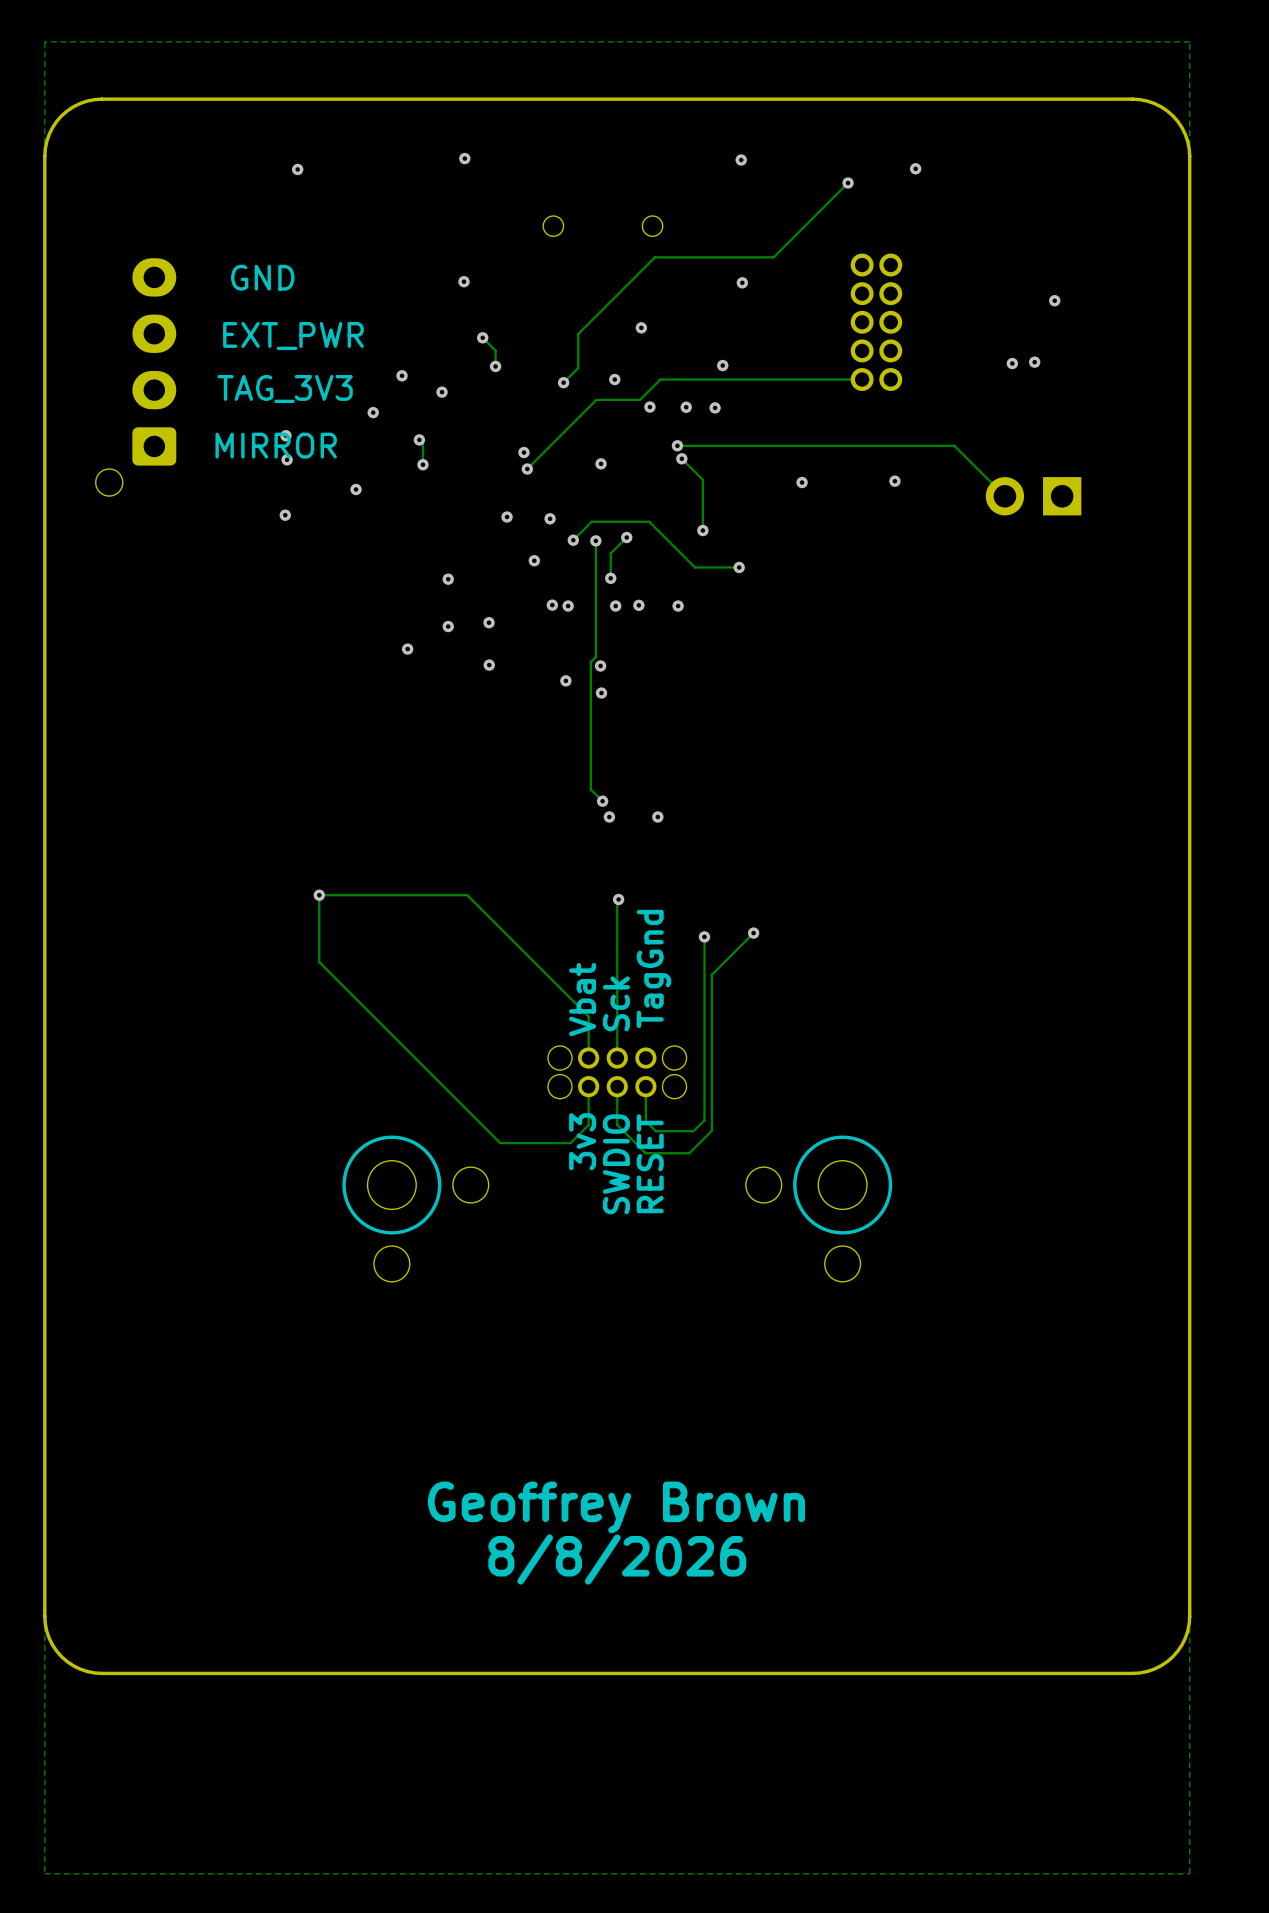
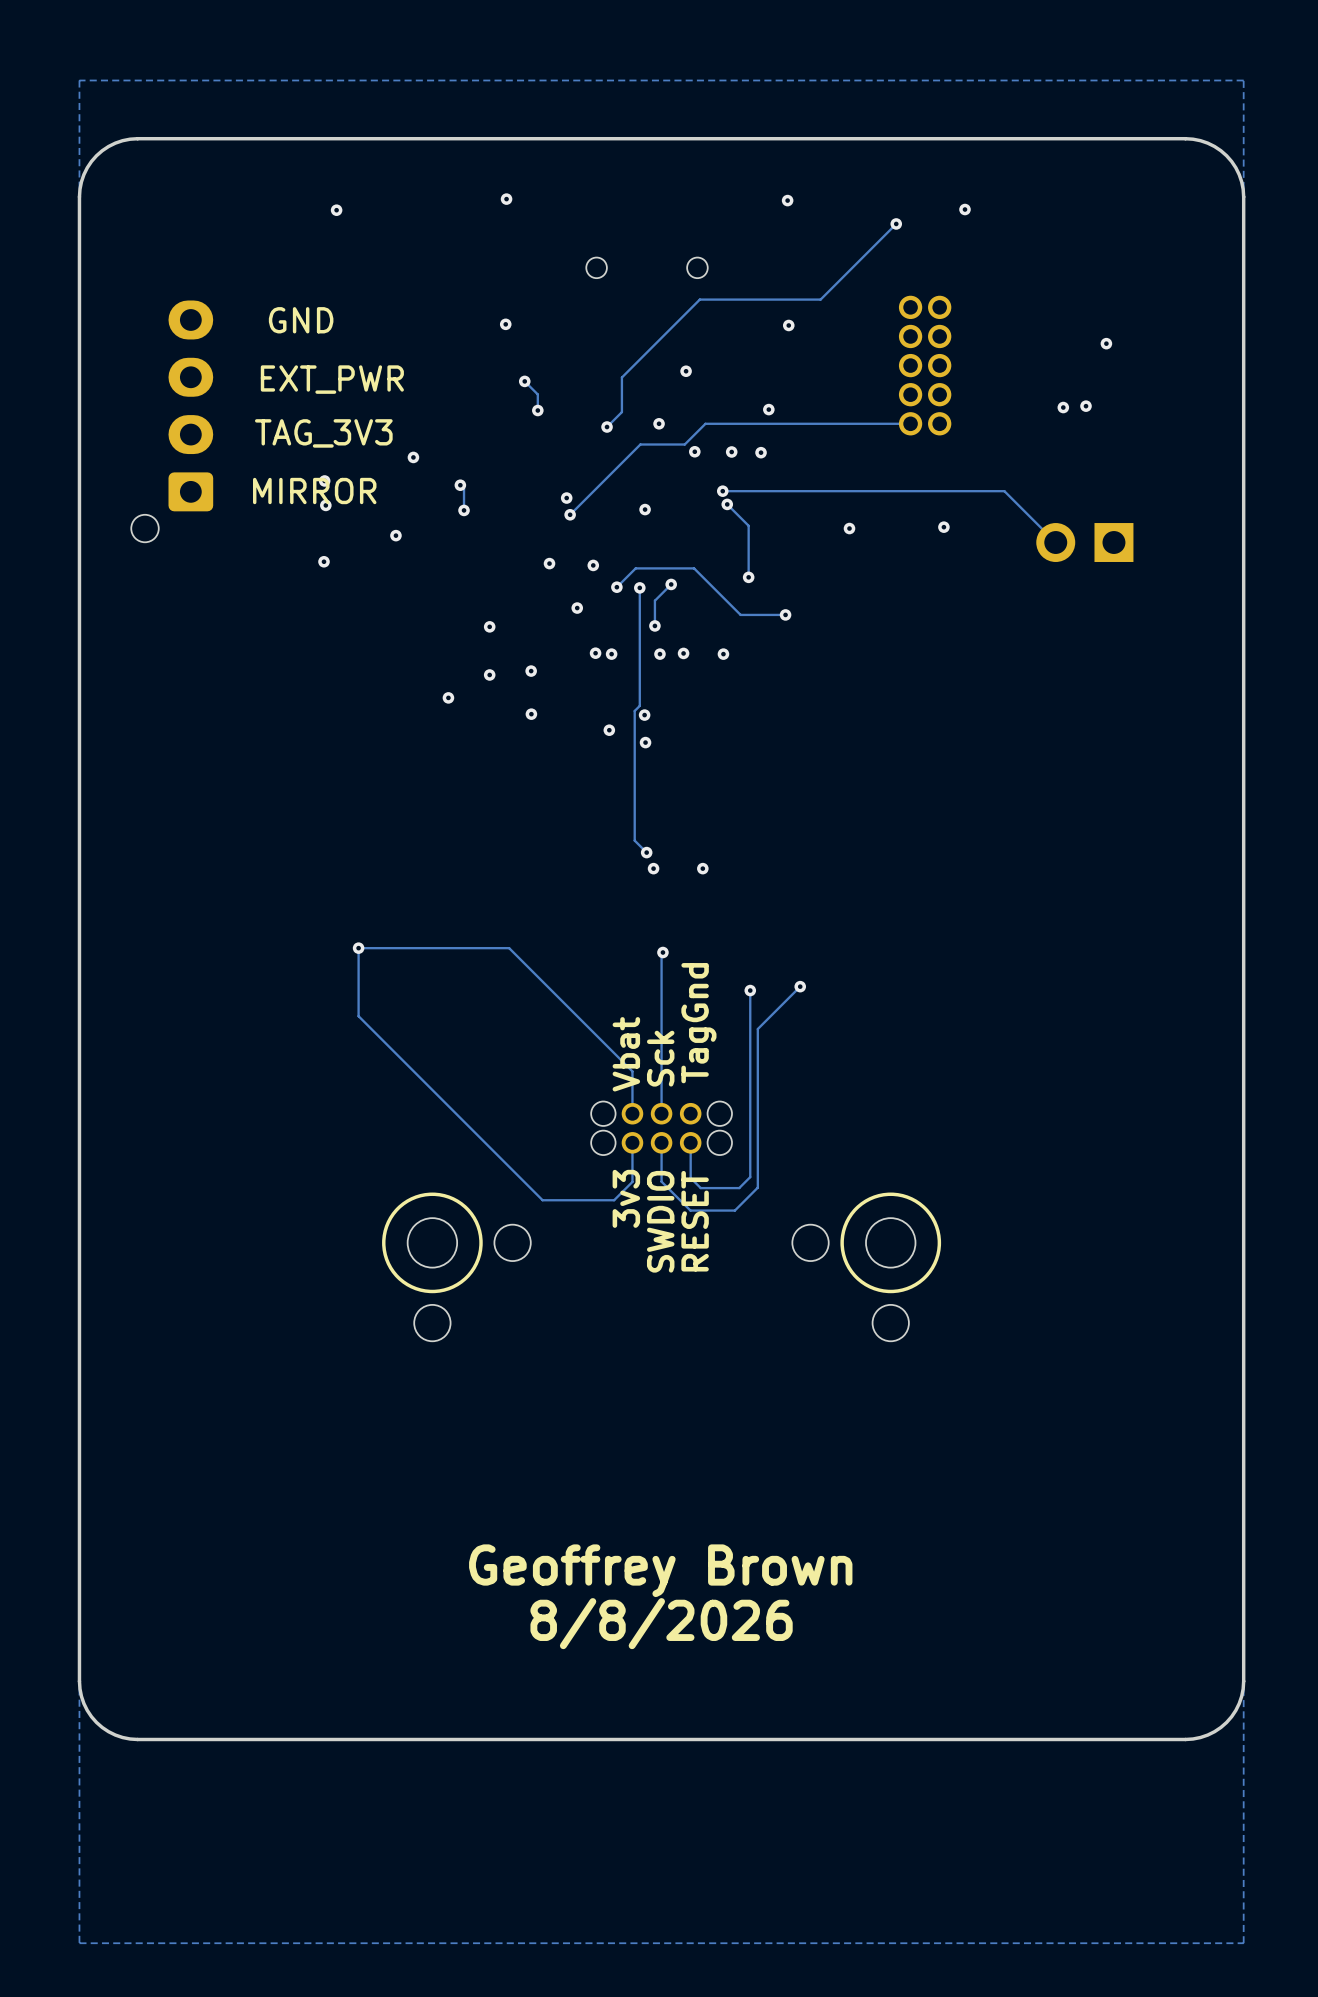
via: (402, 375) -> none
via: (442, 392) -> none

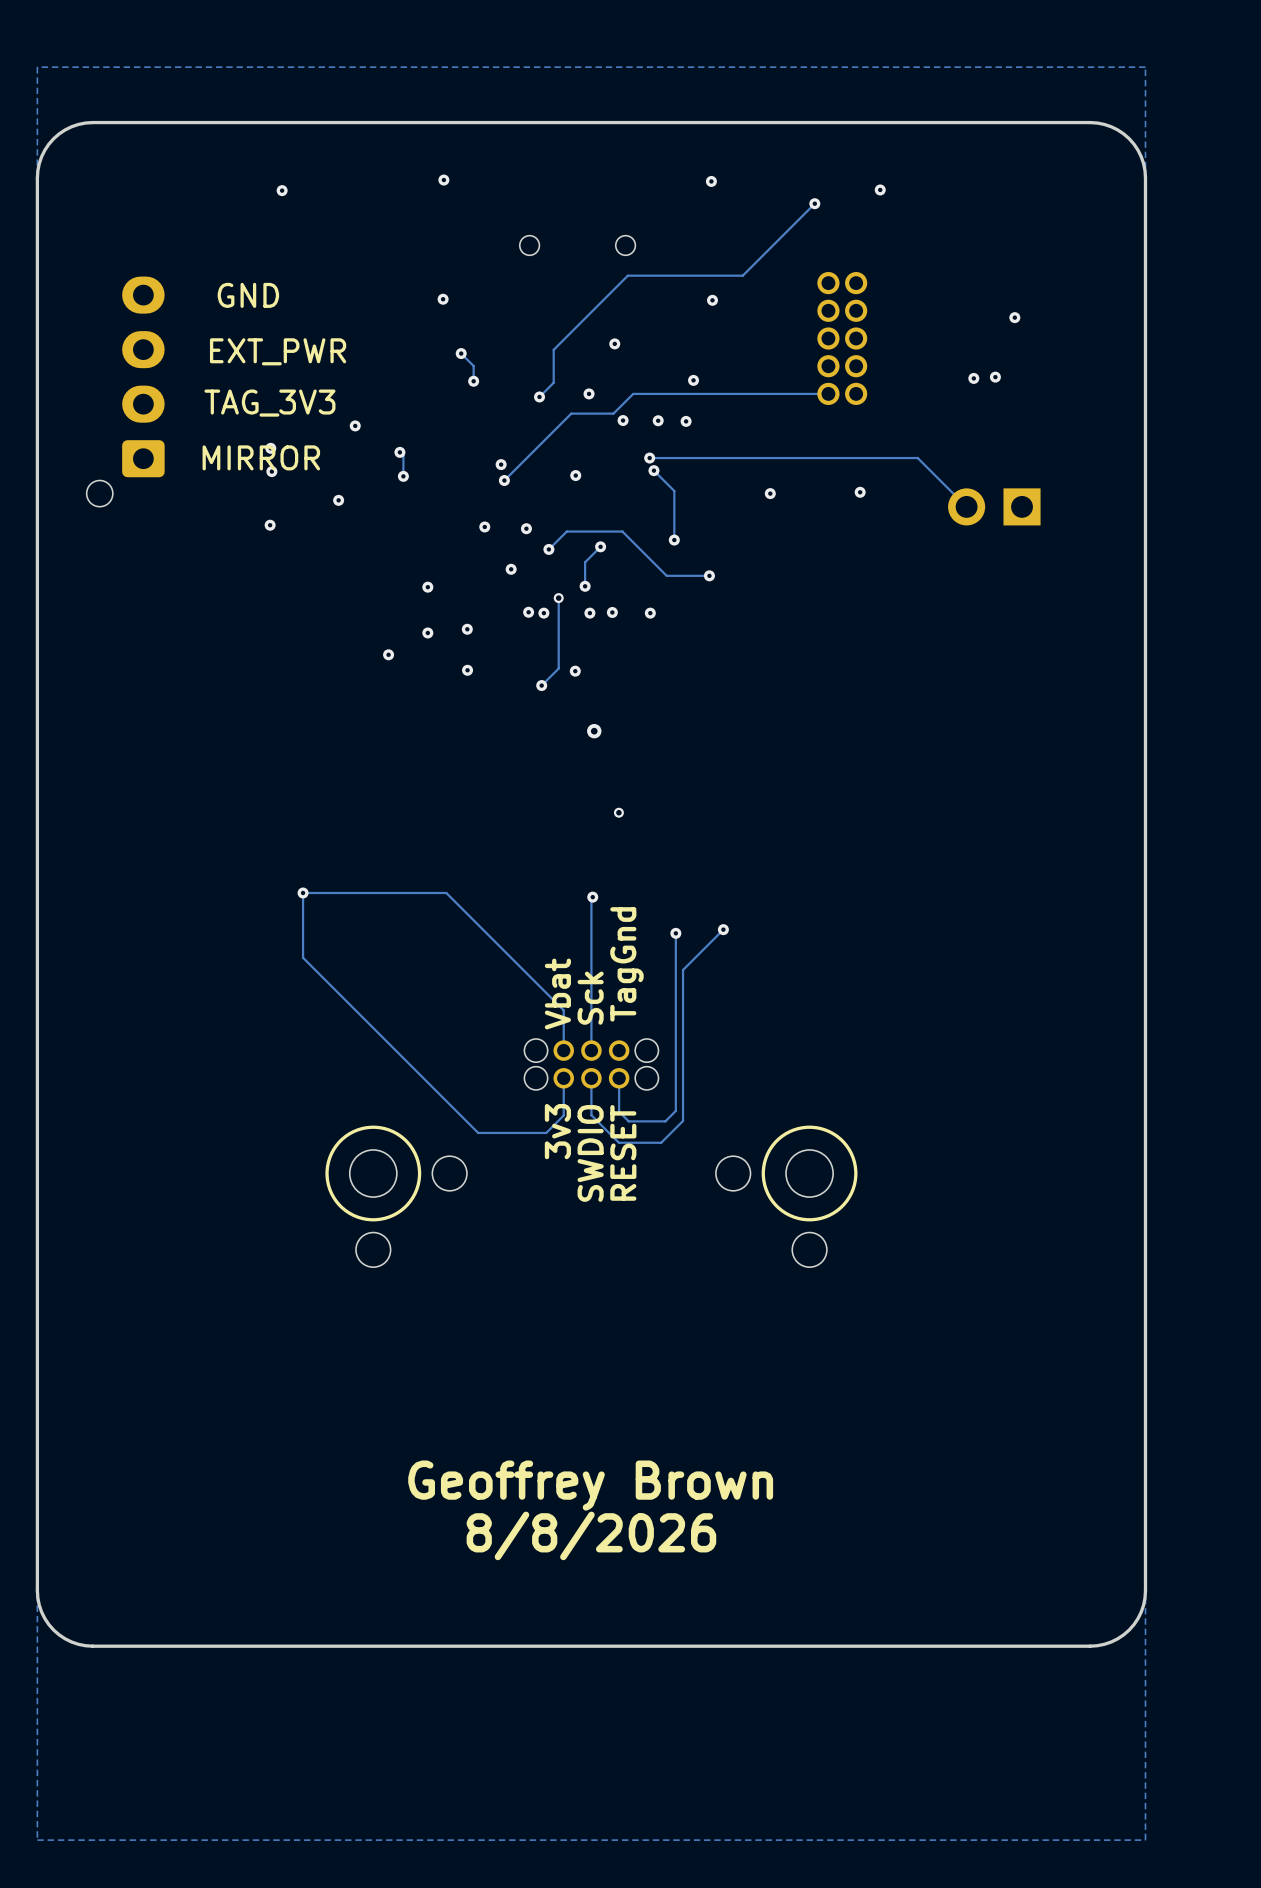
track: (639, 587) (639, 705) (634, 710) (634, 840) (646, 852) -> none
via: (639, 587) -> none
track: none -> (558, 598) (558, 668) (541, 685)
via: none -> (558, 598)
via: (645, 742) -> none
via: none -> (594, 731)
via: (646, 852) -> none
via: none -> (618, 812)
via: (653, 868) -> none
via: (702, 868) -> none

